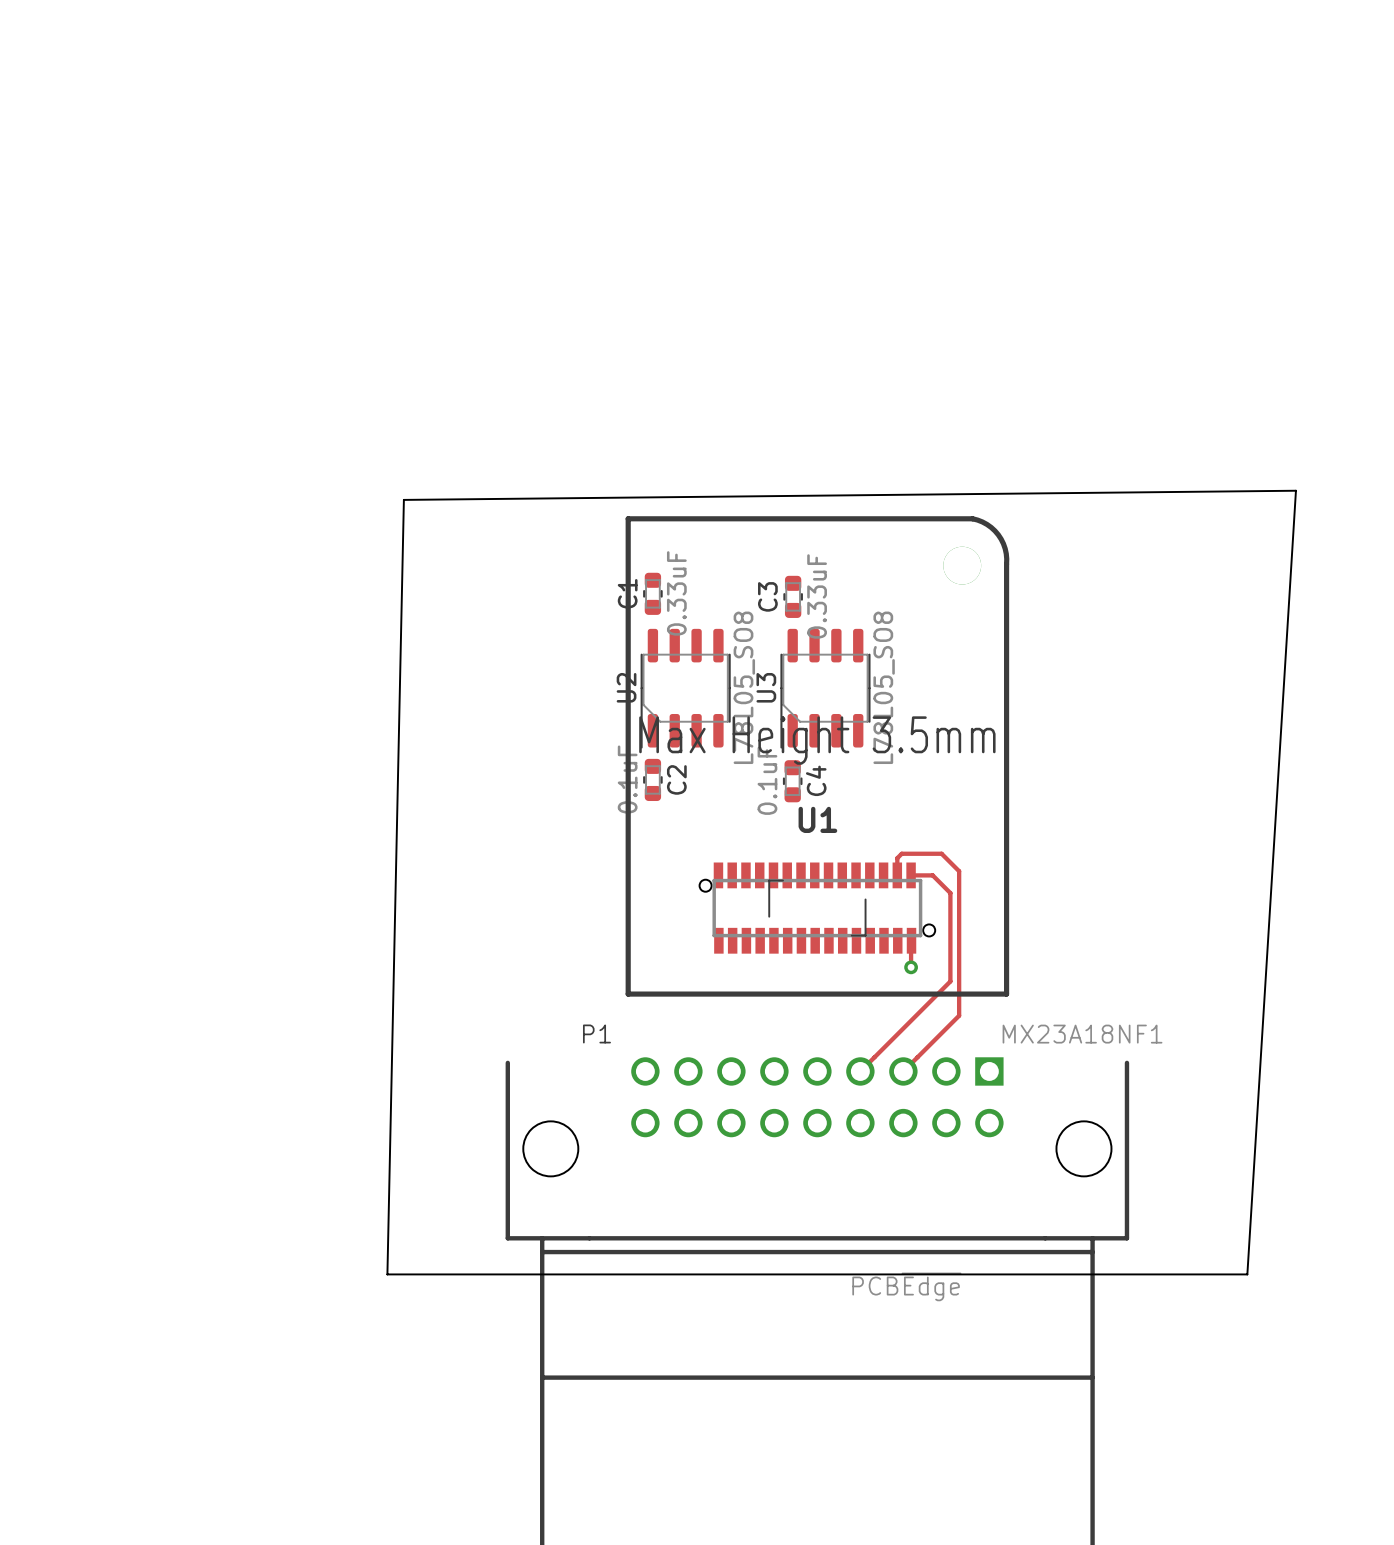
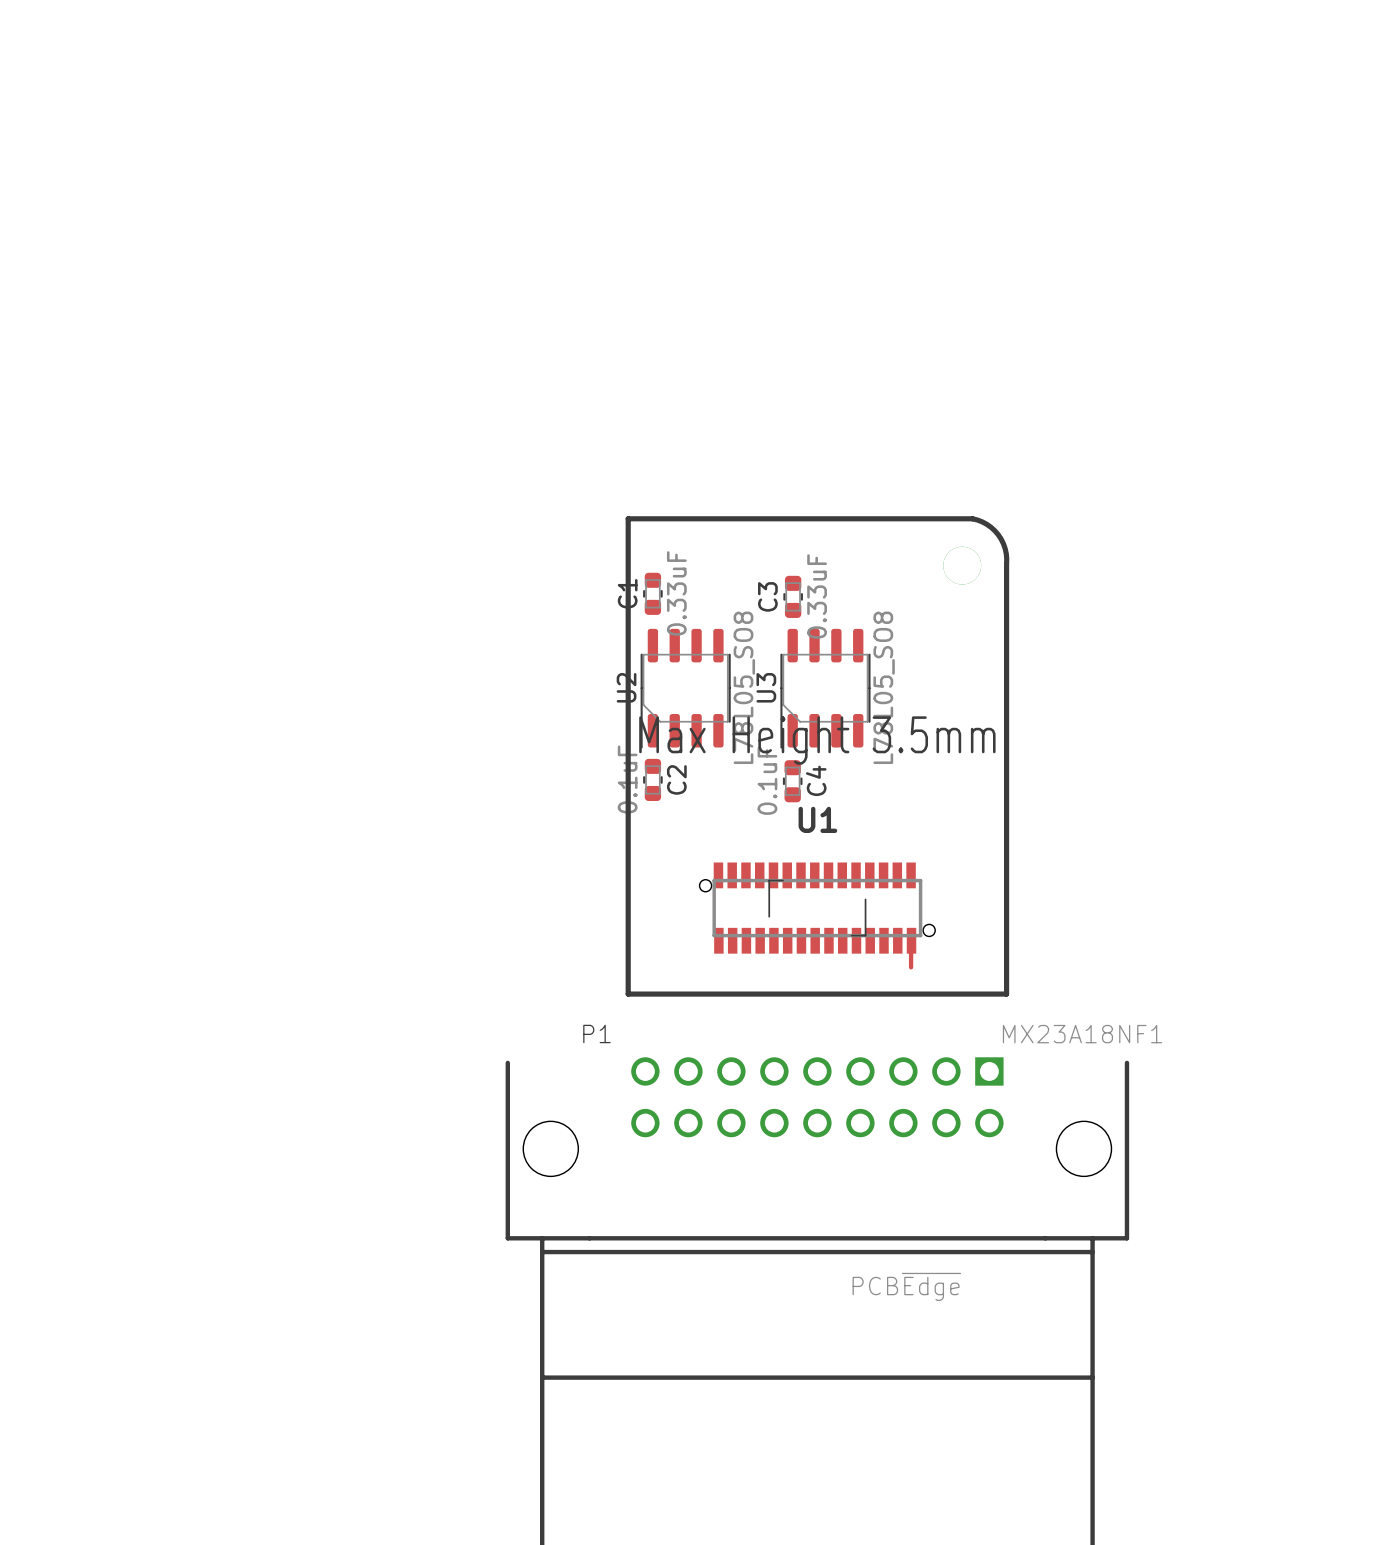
board edge: (1295, 490) (403, 499) (387, 1274) (1247, 1274) (1295, 490) -> none
track: (897, 875) (897, 858) (901, 853) (941, 853) (959, 871) (959, 1015) (903, 1071) -> none
track: (911, 875) (932, 875) (950, 893) (950, 981) (860, 1071) -> none
via: (911, 967) -> none

